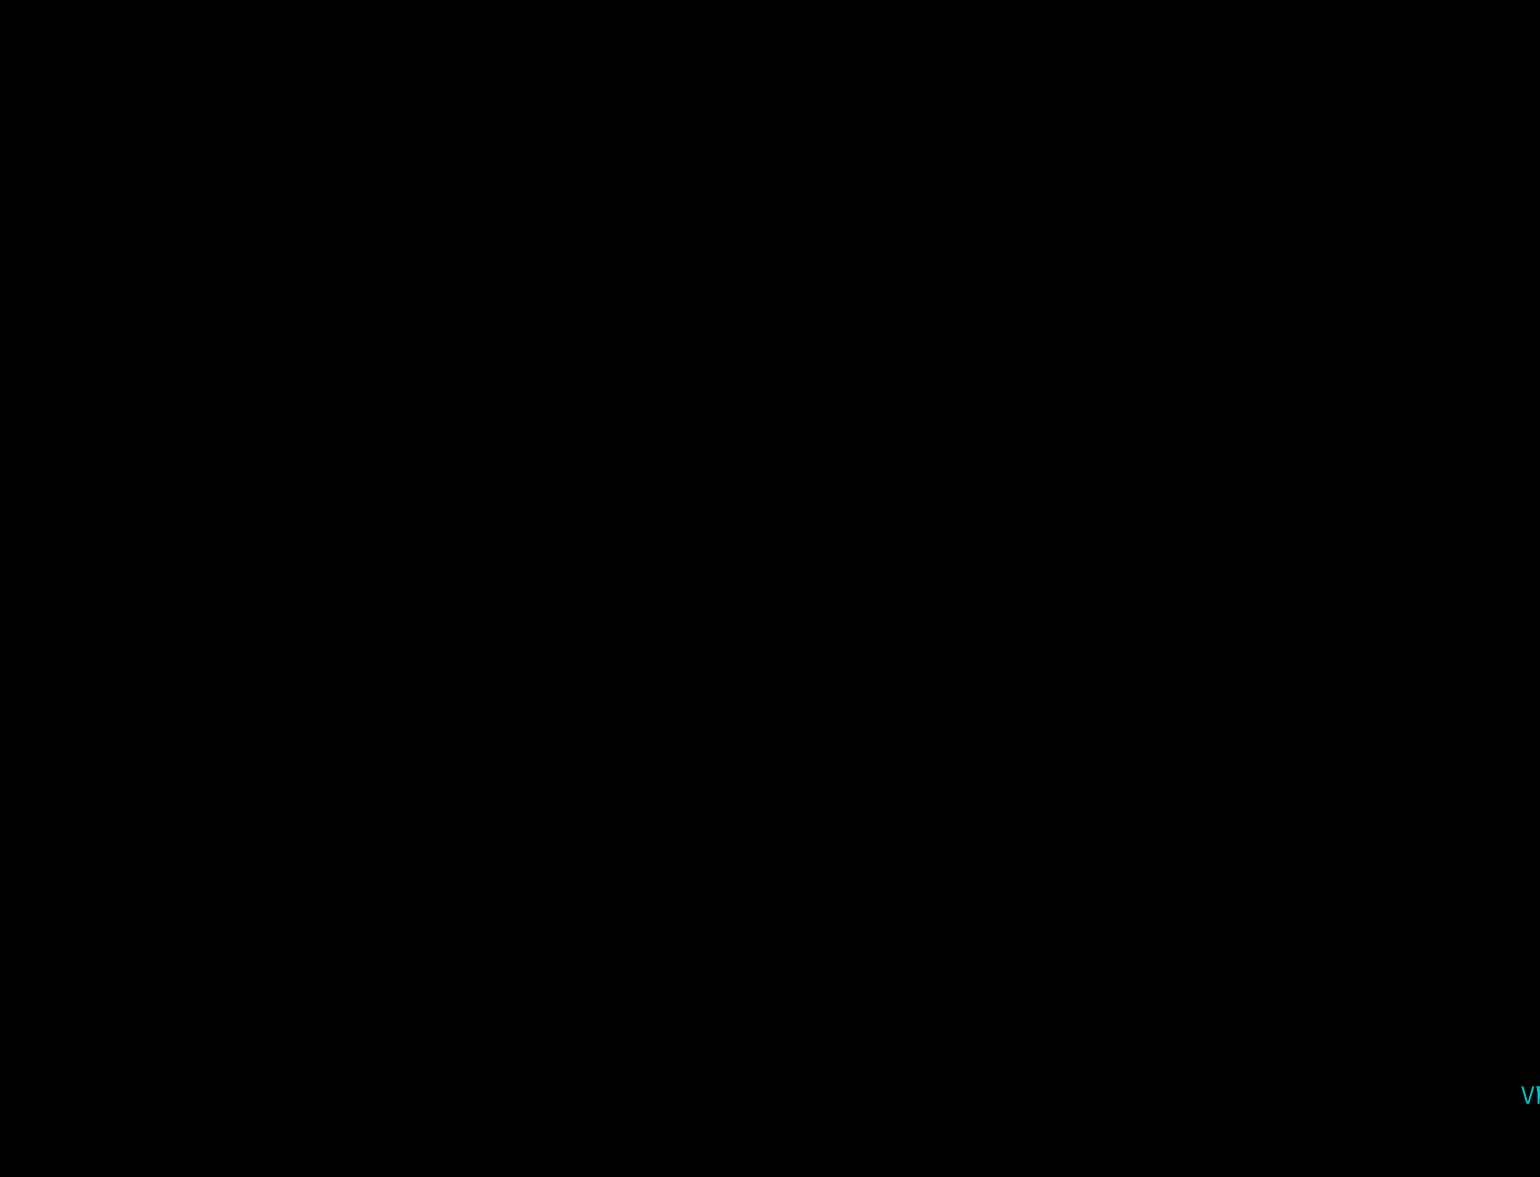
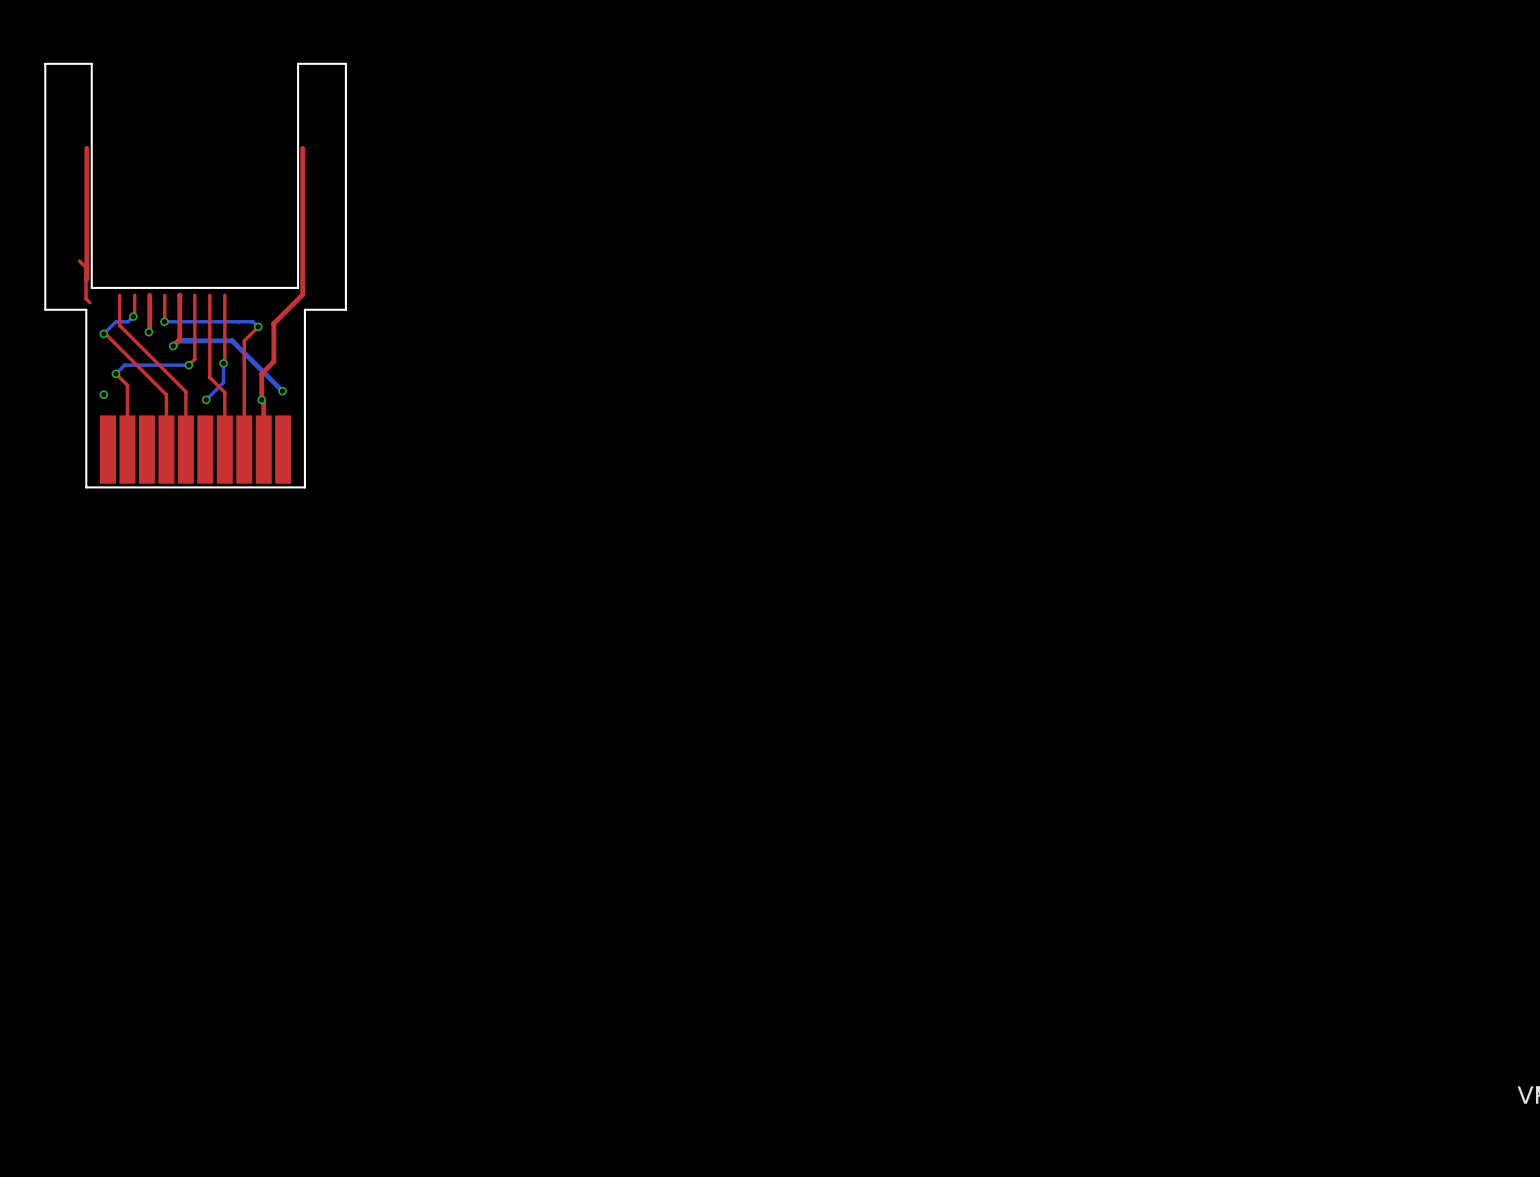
board edge: none -> (45, 63) (45, 309) (86, 309) (86, 487) (304, 487) (304, 309) (345, 309) (345, 63) (298, 63) (298, 287) (91, 287) (91, 63) (45, 63)
top track: none -> (86, 148) (86, 279)
top track: none -> (302, 148) (302, 294) (273, 323) (273, 361) (261, 373) (263, 449)
top track: none -> (79, 261) (86, 267) (86, 298) (89, 302)
top track: none -> (119, 295) (119, 325) (185, 391) (185, 449)
top track: none -> (134, 295) (133, 316)
top track: none -> (149, 295) (148, 332)
top track: none -> (164, 295) (164, 321)
top track: none -> (180, 295) (179, 339) (173, 346)
top track: none -> (194, 295) (194, 359) (188, 365)
top track: none -> (209, 295) (209, 377) (224, 392) (224, 449)
top track: none -> (224, 295) (223, 363)
bottom track: none -> (133, 316) (128, 321) (115, 321) (103, 333)
via: none -> (133, 316)
bottom track: none -> (164, 321) (253, 321) (258, 326)
via: none -> (164, 321)
top track: none -> (258, 326) (244, 340) (244, 449)
via: none -> (258, 326)
via: none -> (148, 332)
top track: none -> (103, 333) (166, 394) (166, 449)
via: none -> (103, 333)
bottom track: none -> (173, 346) (178, 340) (232, 340) (282, 391)
via: none -> (173, 346)
bottom track: none -> (223, 363) (223, 382) (206, 399)
via: none -> (223, 363)
bottom track: none -> (188, 365) (124, 365) (115, 373)
via: none -> (188, 365)
top track: none -> (115, 373) (127, 385) (128, 448)
via: none -> (115, 373)
via: none -> (282, 391)
via: none -> (103, 394)
via: none -> (206, 399)
via: none -> (261, 399)
part: none -> (195, 449)

